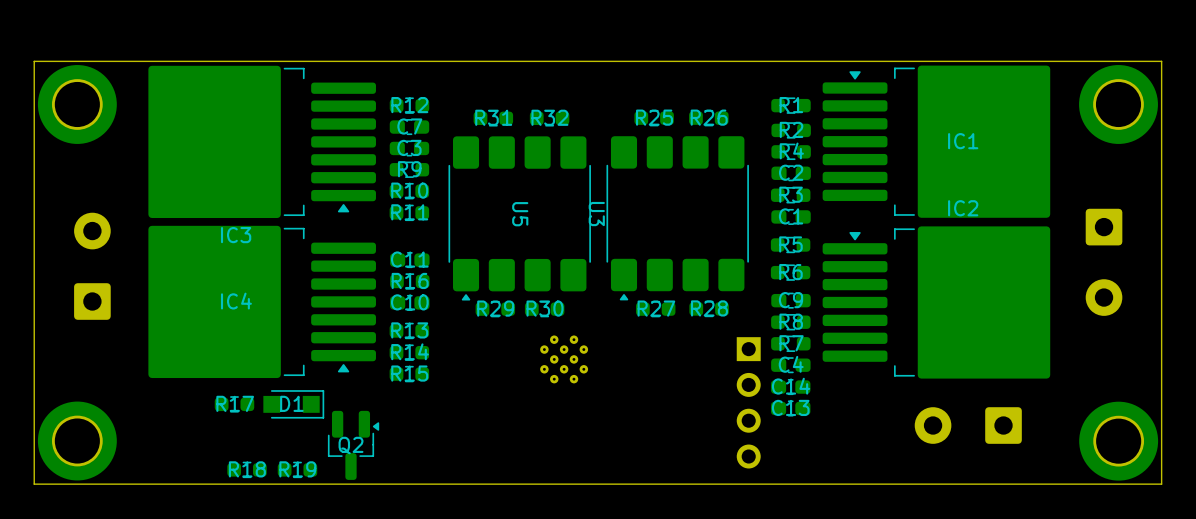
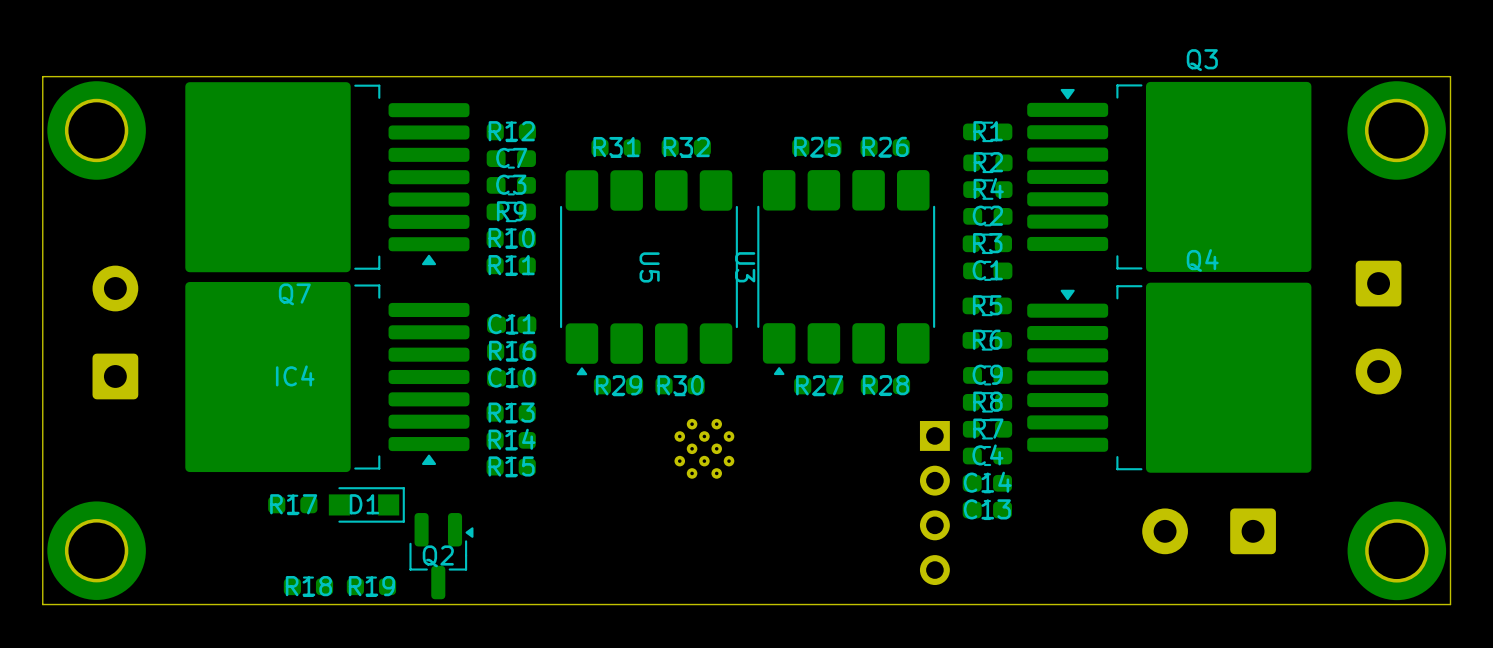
IC1 name: IC1 (963, 141) -> Q3 (1202, 60)
IC2 name: IC2 (963, 208) -> Q4 (1202, 260)
IC3 name: IC3 (236, 235) -> Q7 (294, 294)

